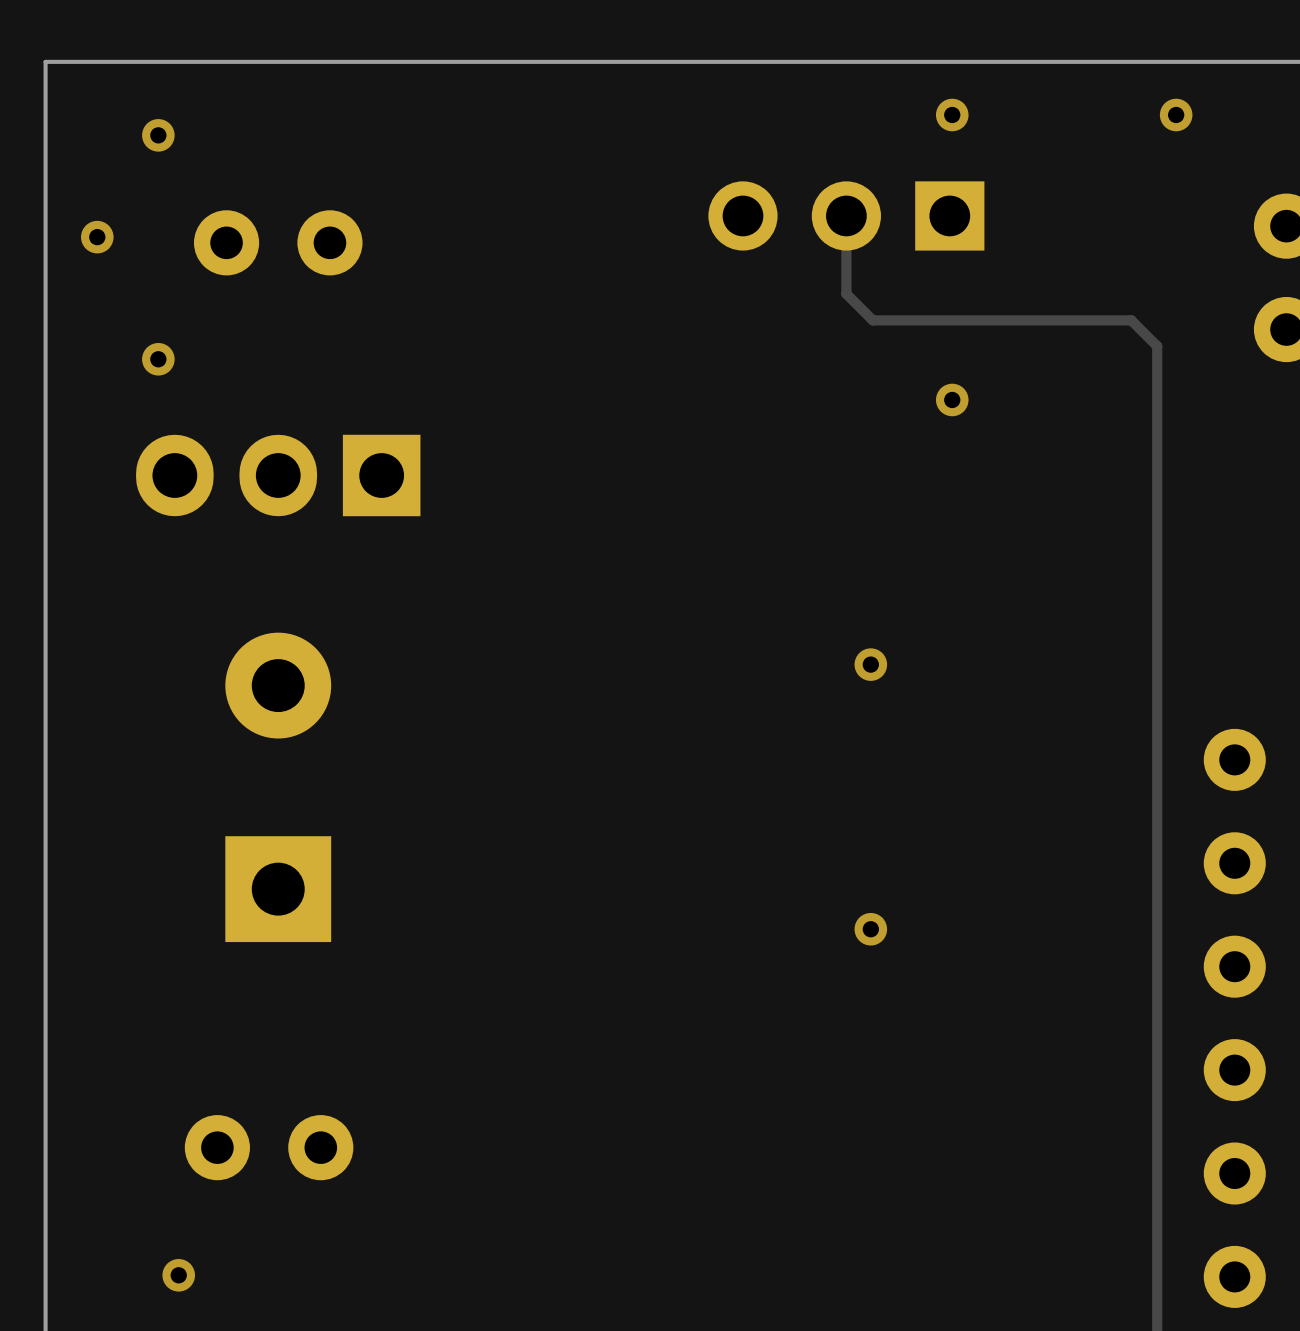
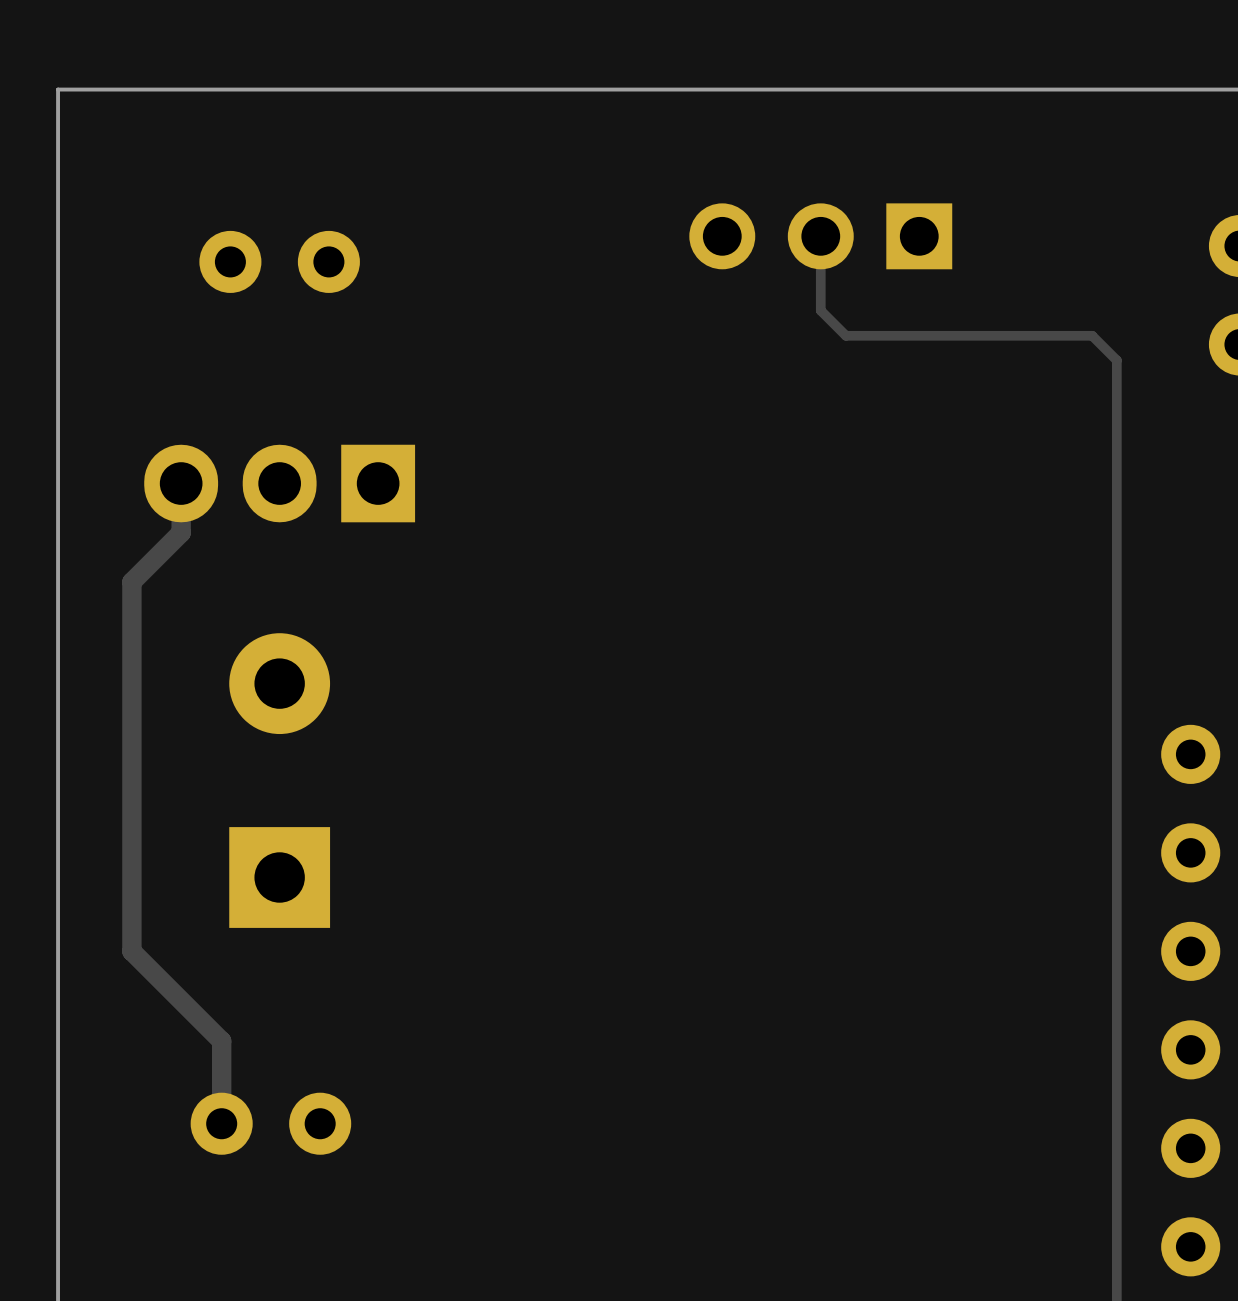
via: (952, 115) -> none
via: (1176, 115) -> none
via: (158, 135) -> none
via: (97, 237) -> none
via: (158, 359) -> none
via: (952, 399) -> none
track: none -> (181, 483) (181, 532) (131, 582) (131, 951) (221, 1041) (221, 1123)
via: (870, 664) -> none
via: (870, 929) -> none
via: (178, 1275) -> none

